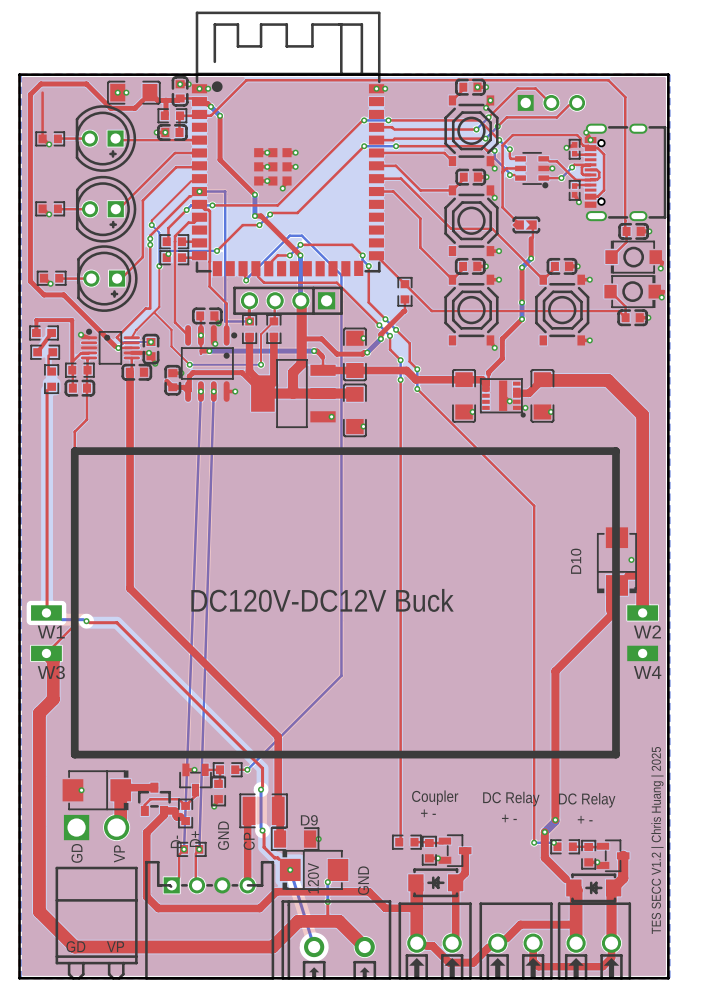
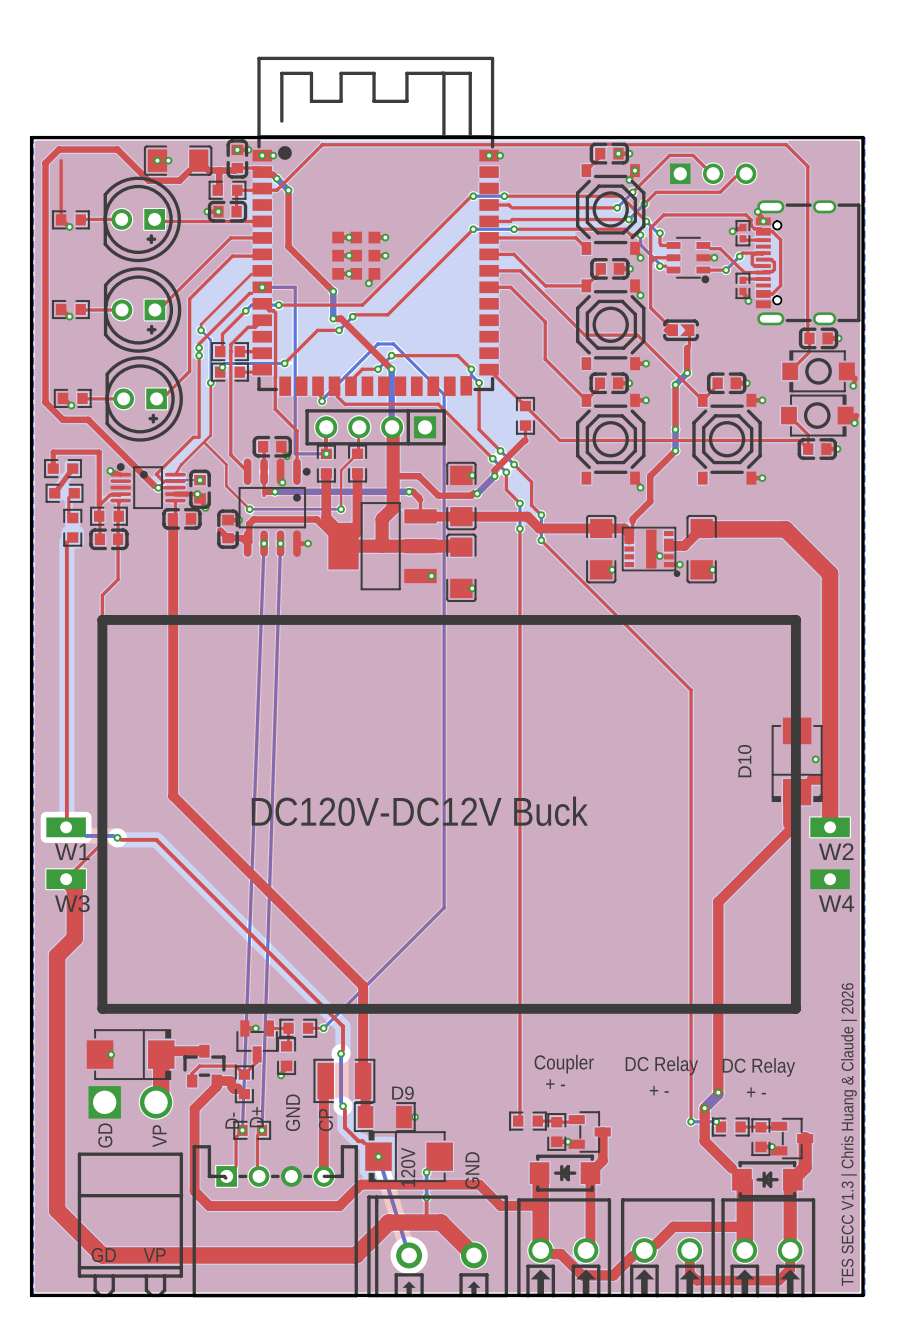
via: (200, 335) -> none
text: TES SECC V1.2 | Chris Huang | 2025 (657, 840) -> TES SECC V1.3 | Chris Huang & Claude | 2026 (849, 1134)

